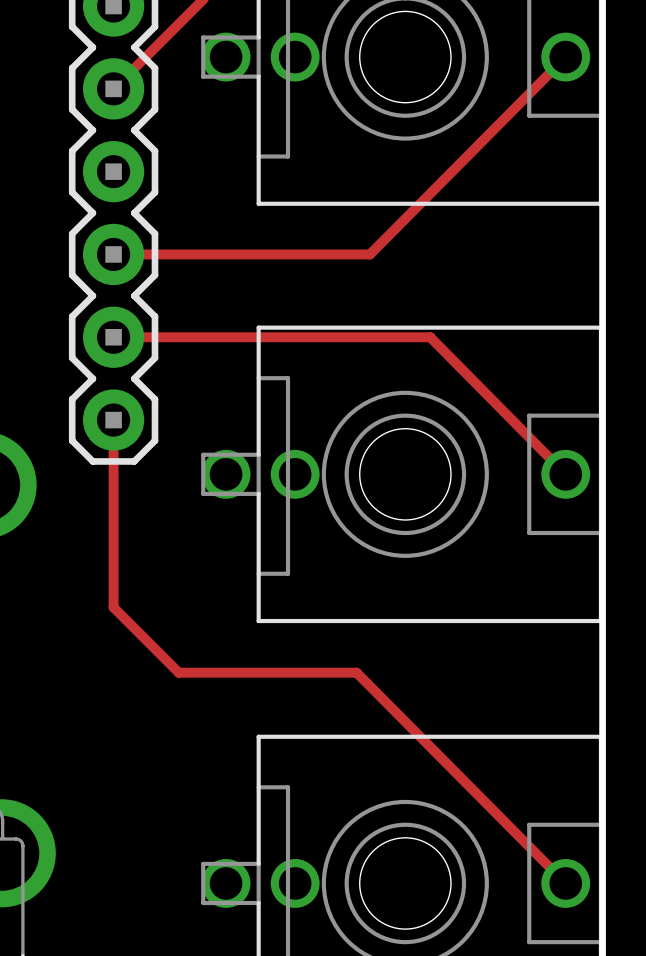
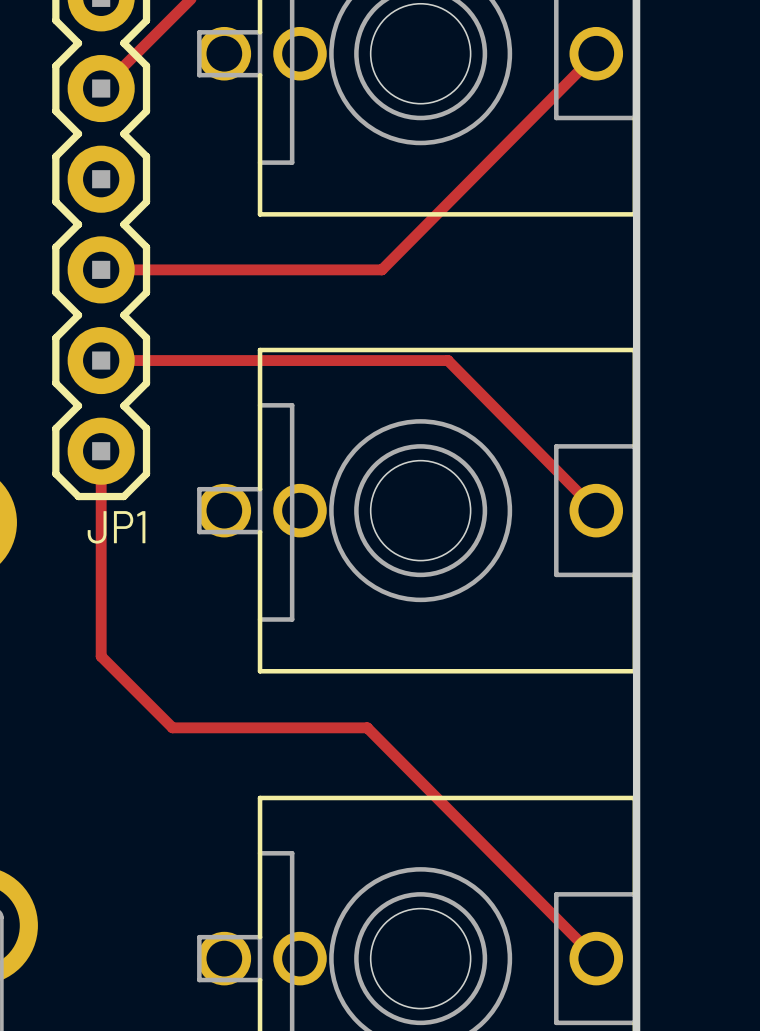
JP1 name: none -> JP1 (116, 527)

